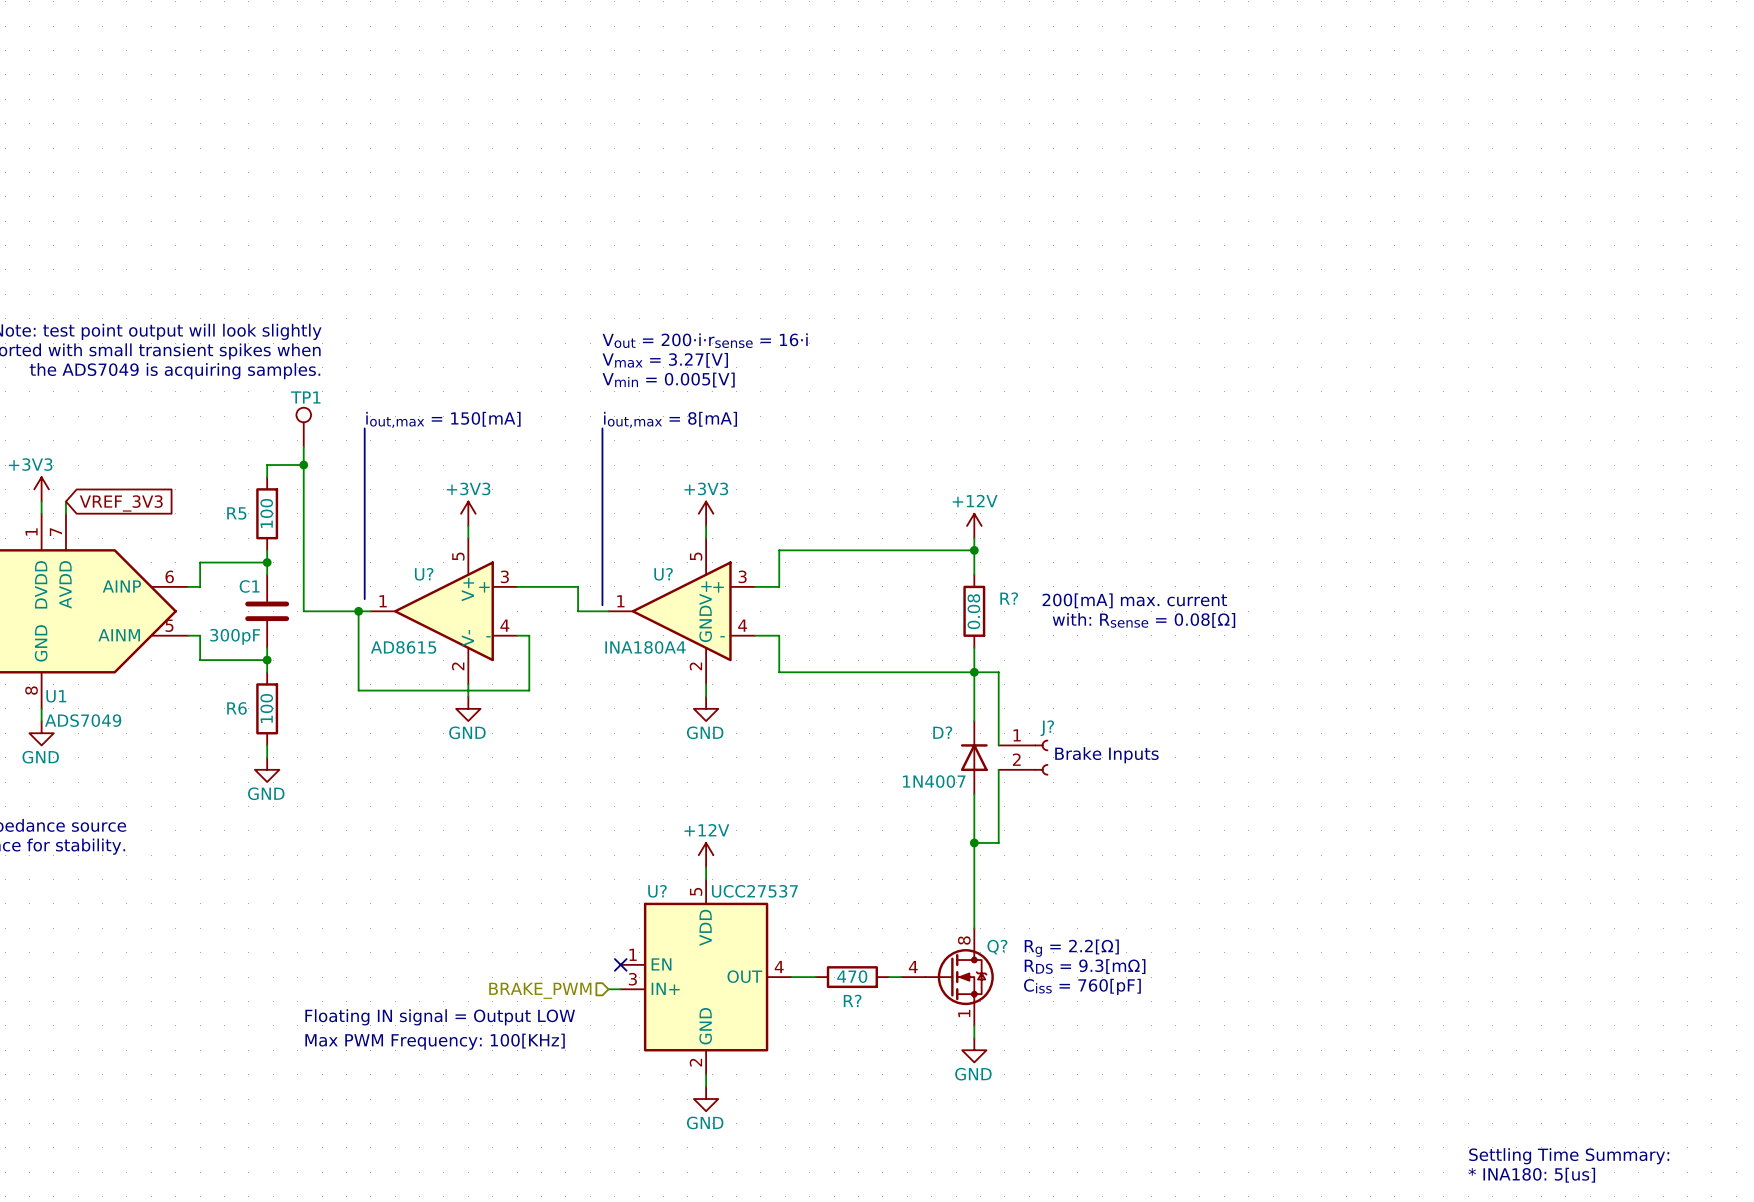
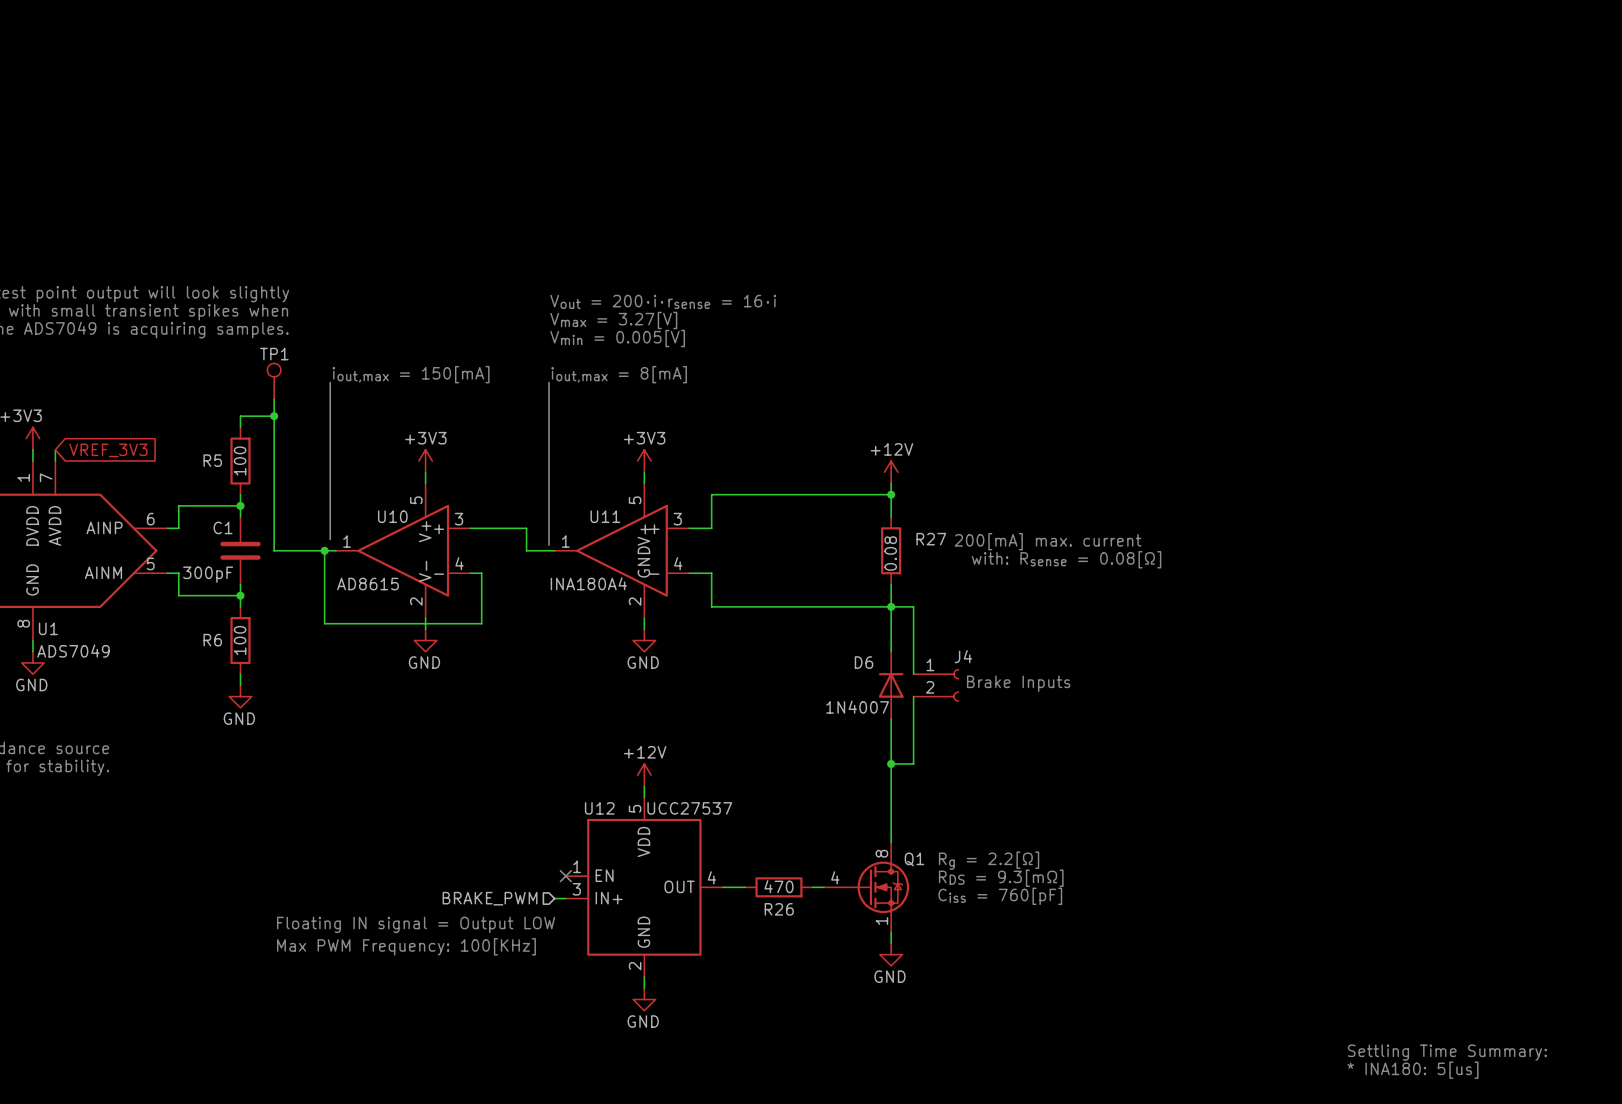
U? name: U? (424, 574) -> U10 (392, 516)
U? name: U? (663, 574) -> U11 (605, 516)
R? name: R? (1009, 598) -> R27 (931, 539)
J? name: J? (1047, 728) -> J4 (963, 656)
D? name: D? (942, 732) -> D6 (864, 662)
U? name: U? (657, 891) -> U12 (599, 808)
Q? name: Q? (997, 947) -> Q1 (914, 859)
R? name: R? (852, 1000) -> R26 (779, 909)

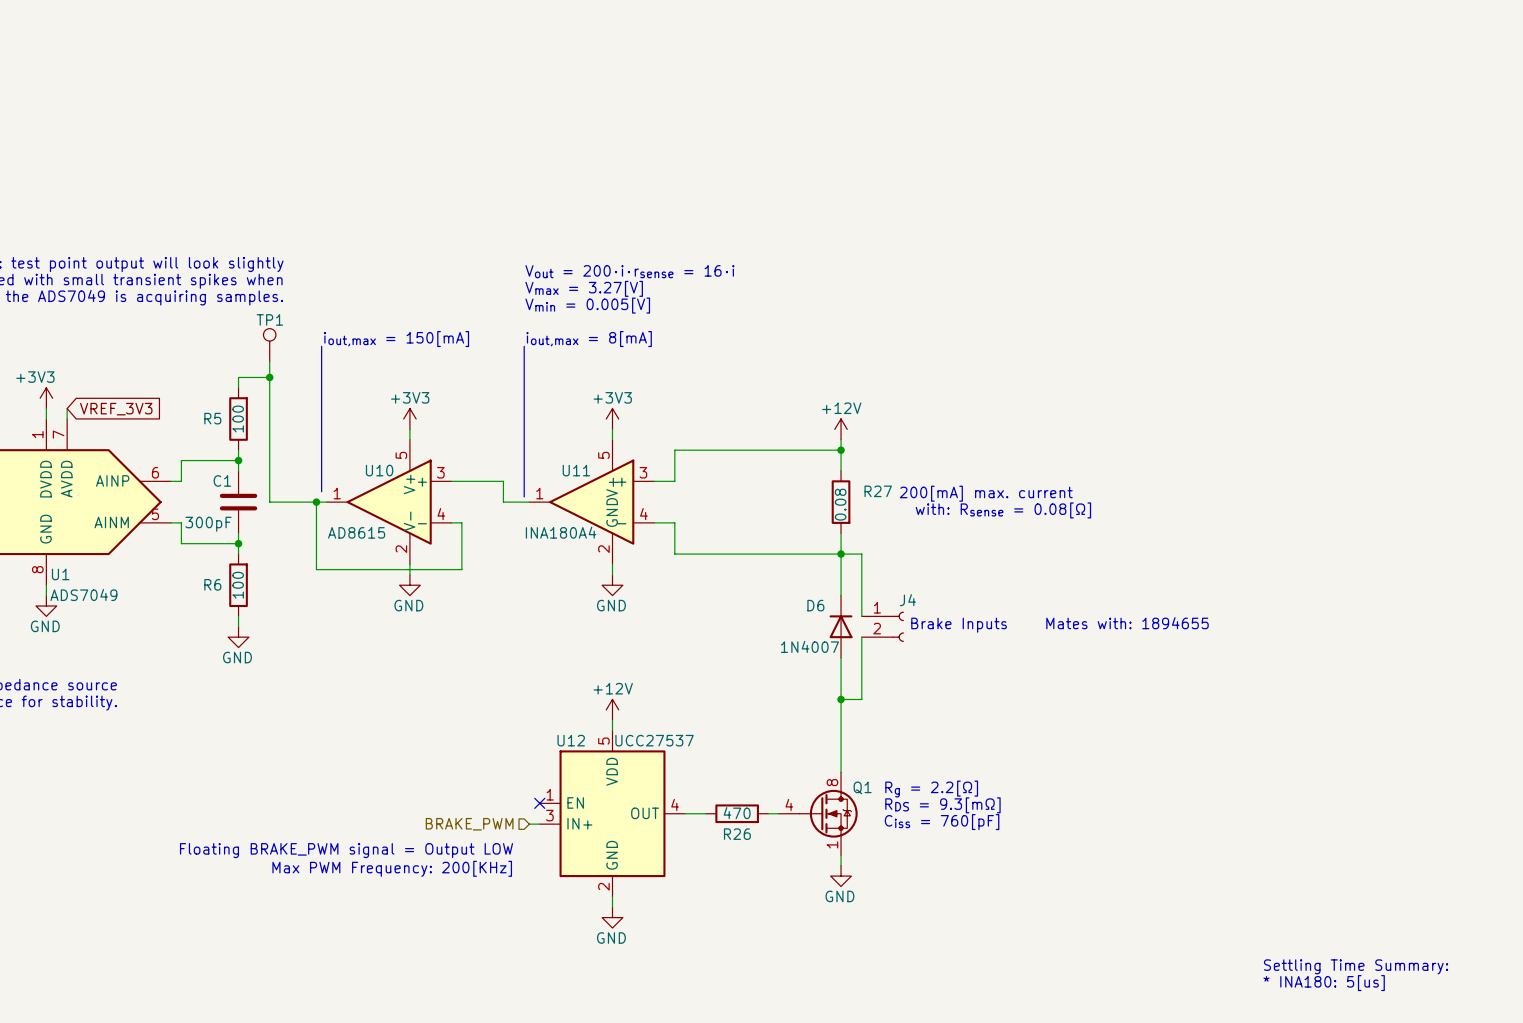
text: none -> Mates with: 1894655 (1127, 623)
text: Floating IN signal = Output LOW (416, 924) -> Floating BRAKE_PWM signal = Output LOW (346, 850)
text: Max PWM Frequency: 100[KHz] (406, 946) -> Max PWM Frequency: 200[KHz] (392, 868)

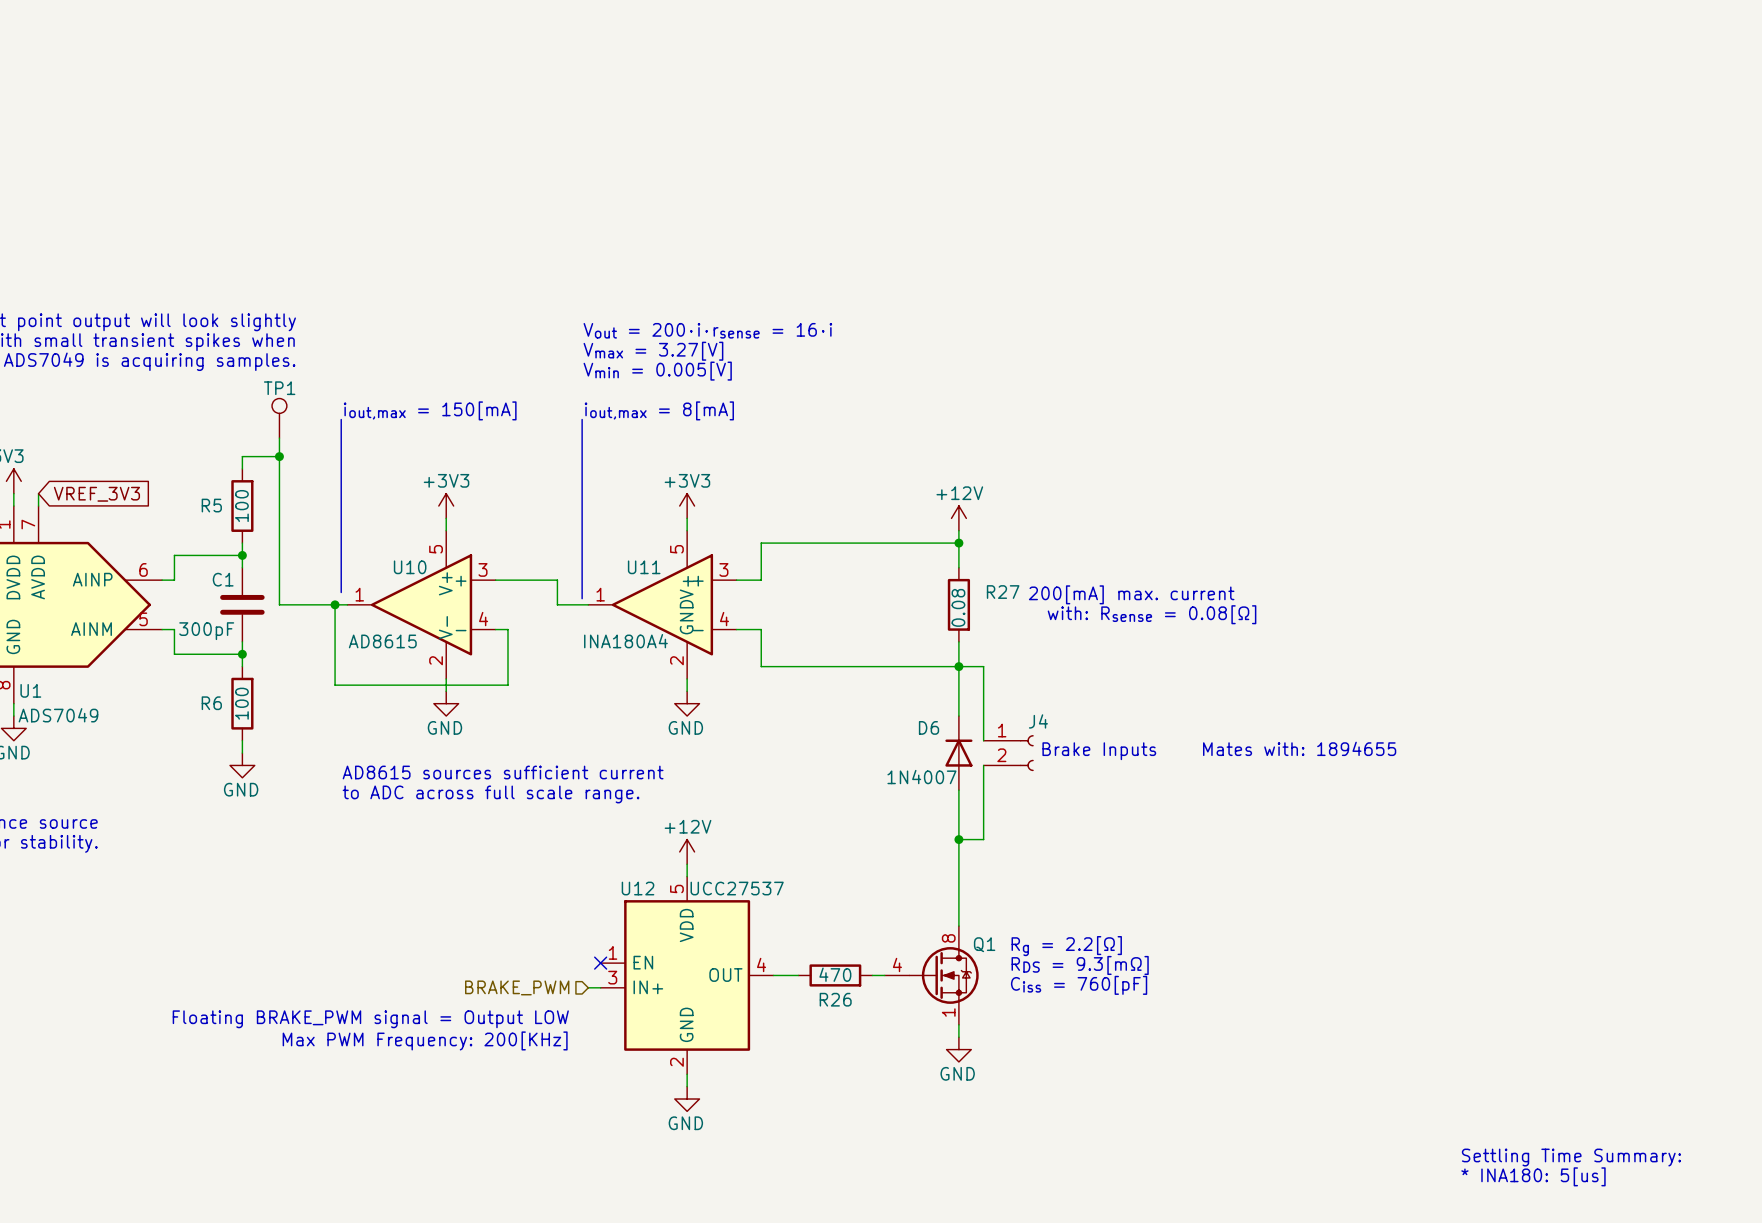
text: none -> AD8615 sources sufficient current (503, 772)
text: none -> to ADC across full scale range. (491, 794)

